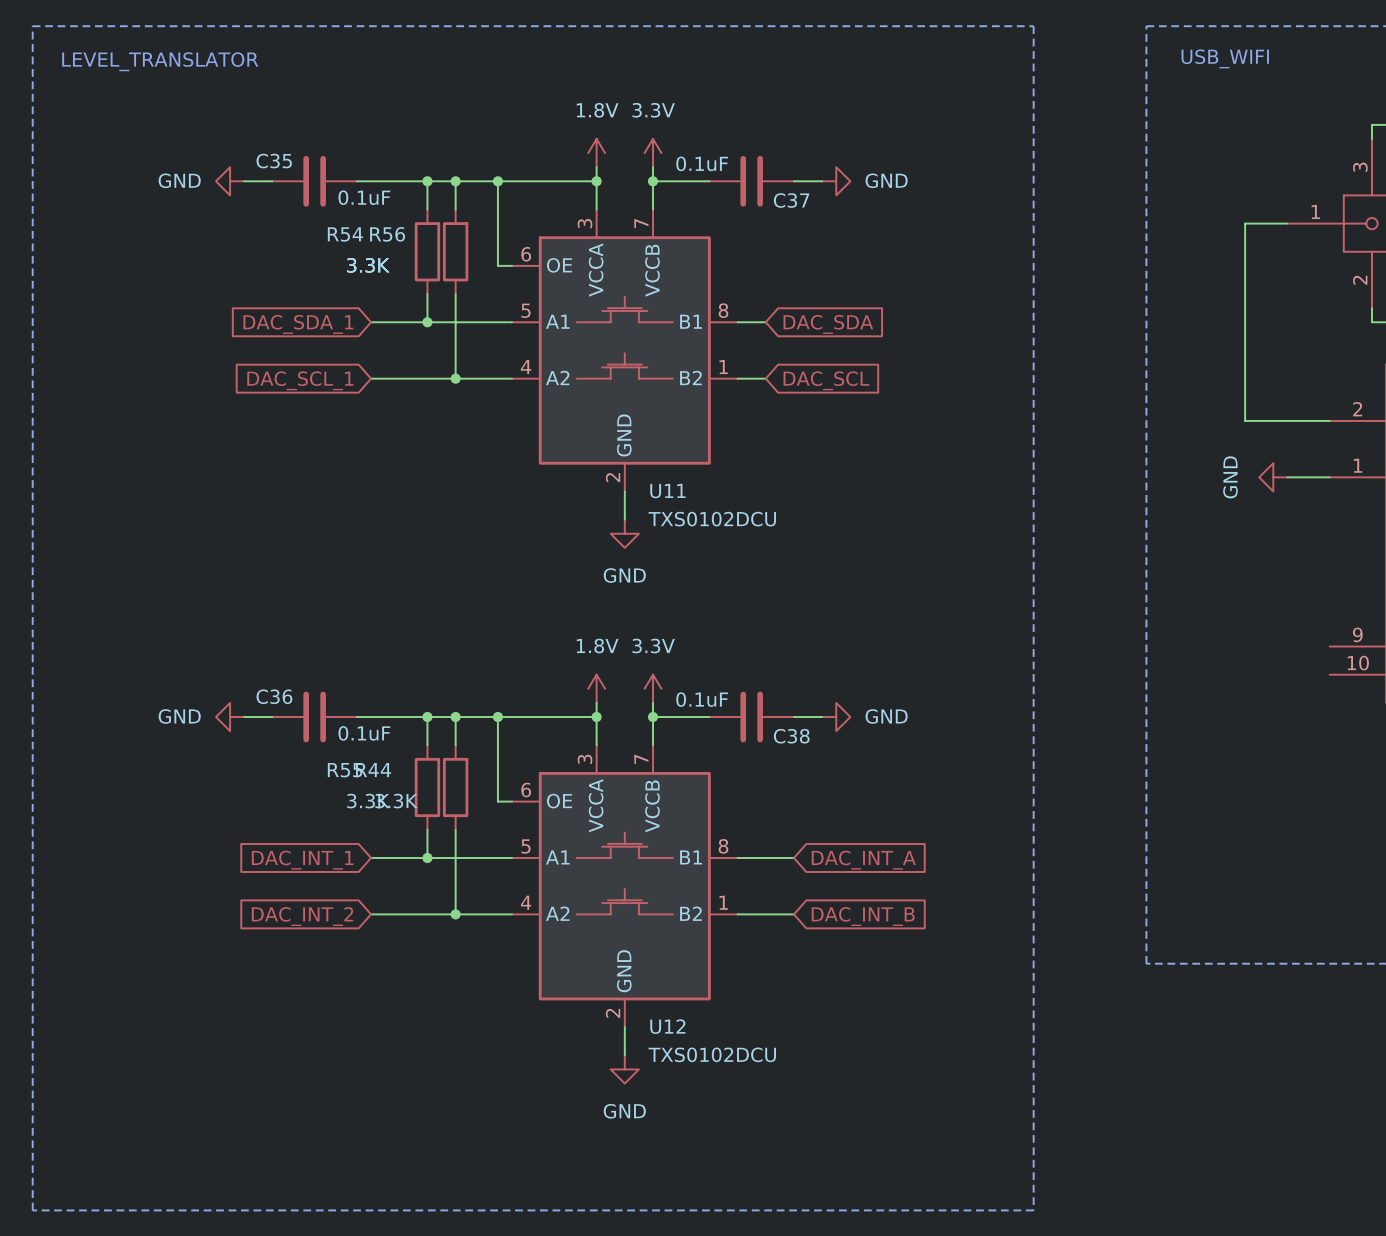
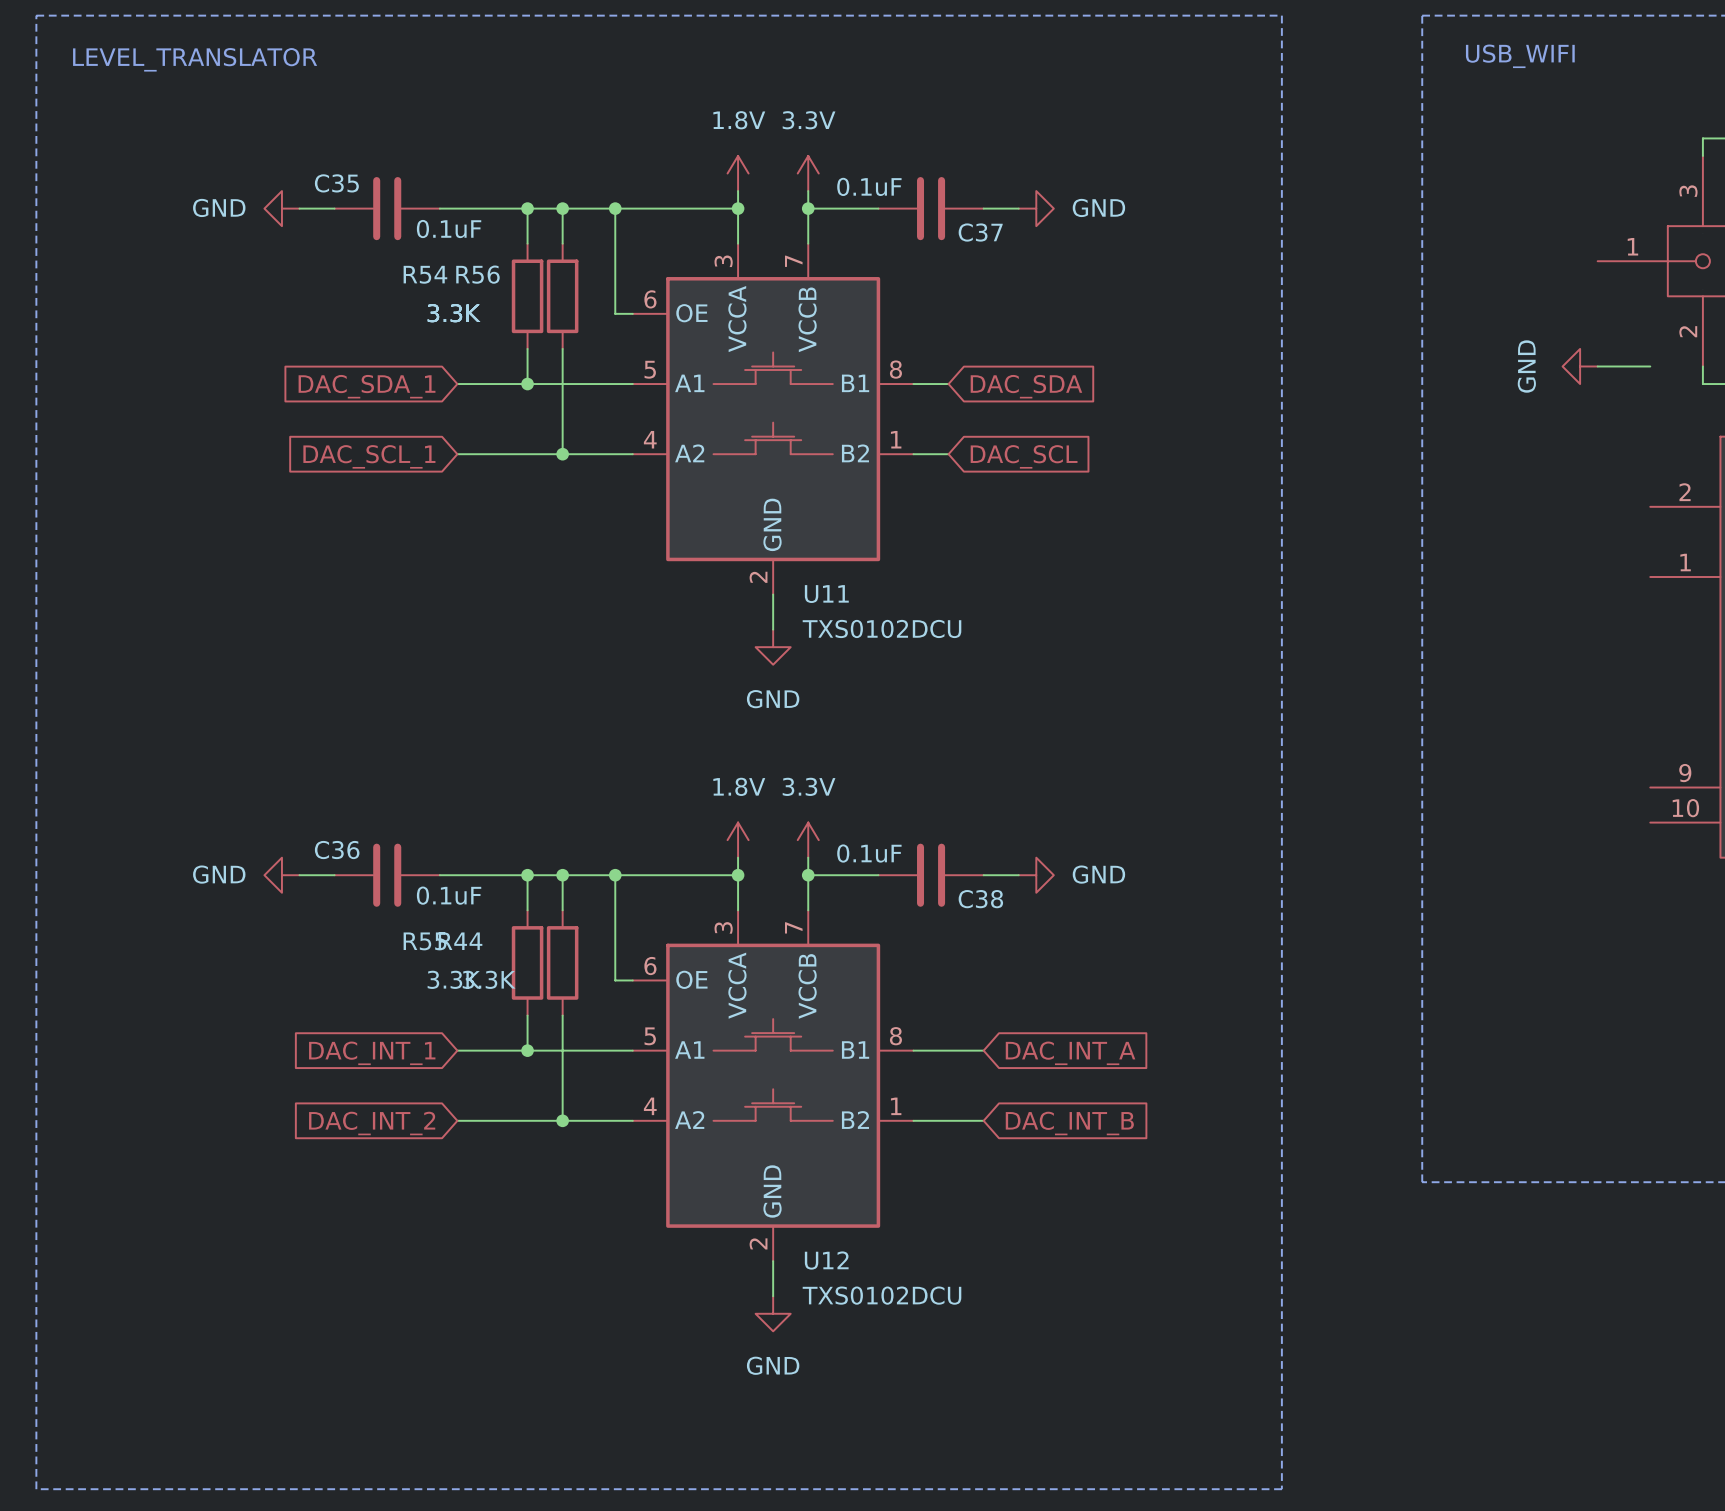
wire: (1287, 223) (1245, 223) (1245, 420) (1329, 420) -> none
power symbol: none -> GND (1580, 366)
power symbol: GND (1273, 477) -> none
wire: (1287, 477) (1329, 477) -> (1597, 366) (1650, 366)

